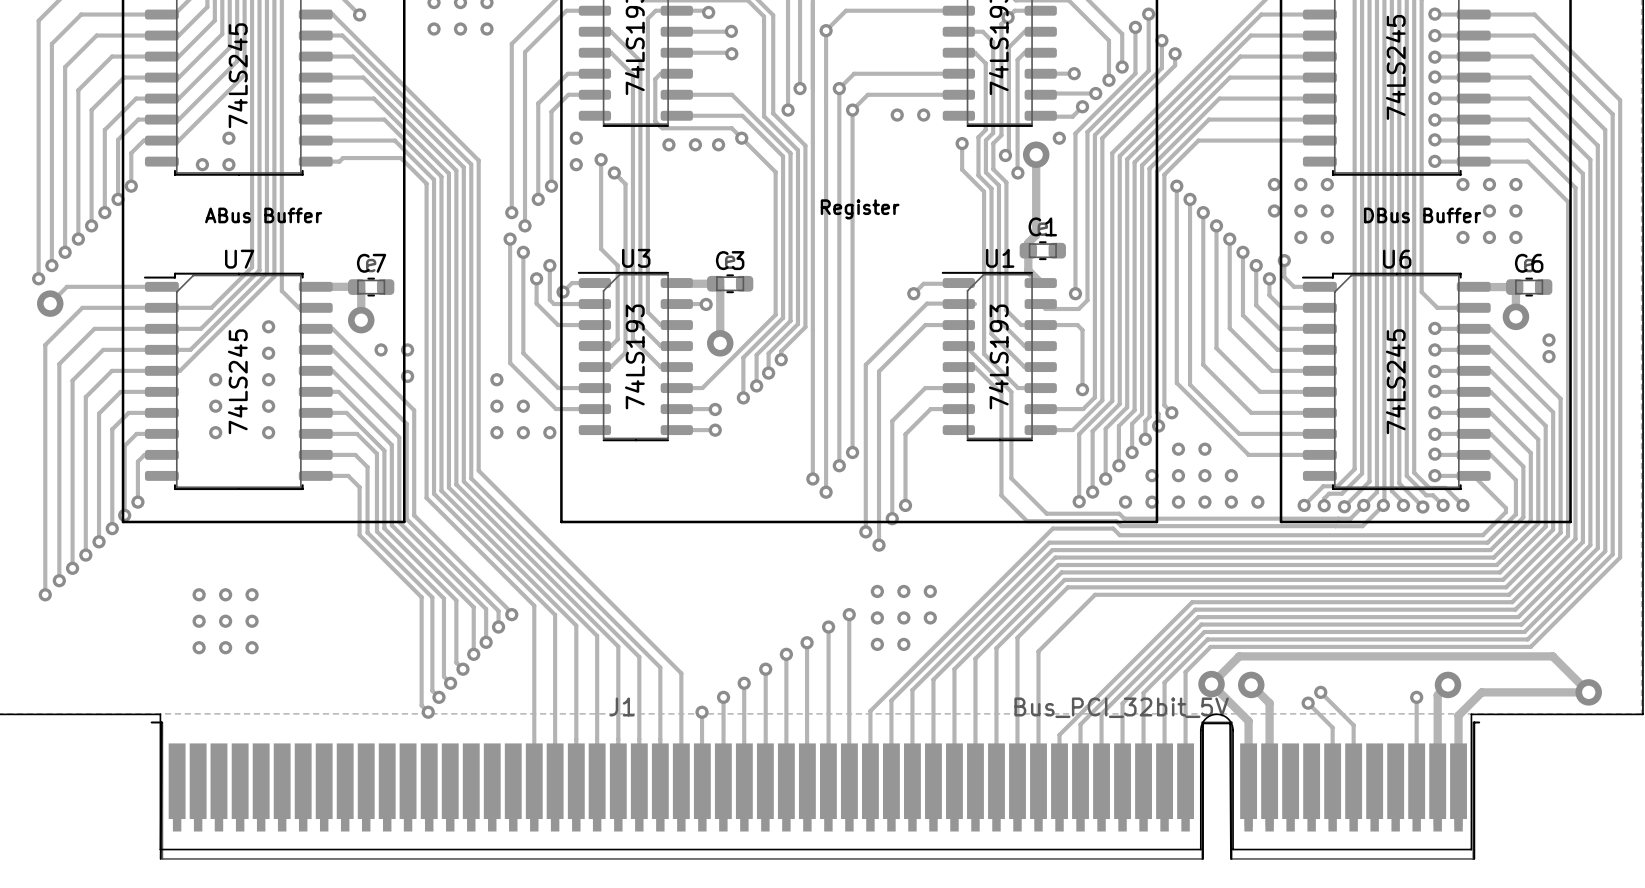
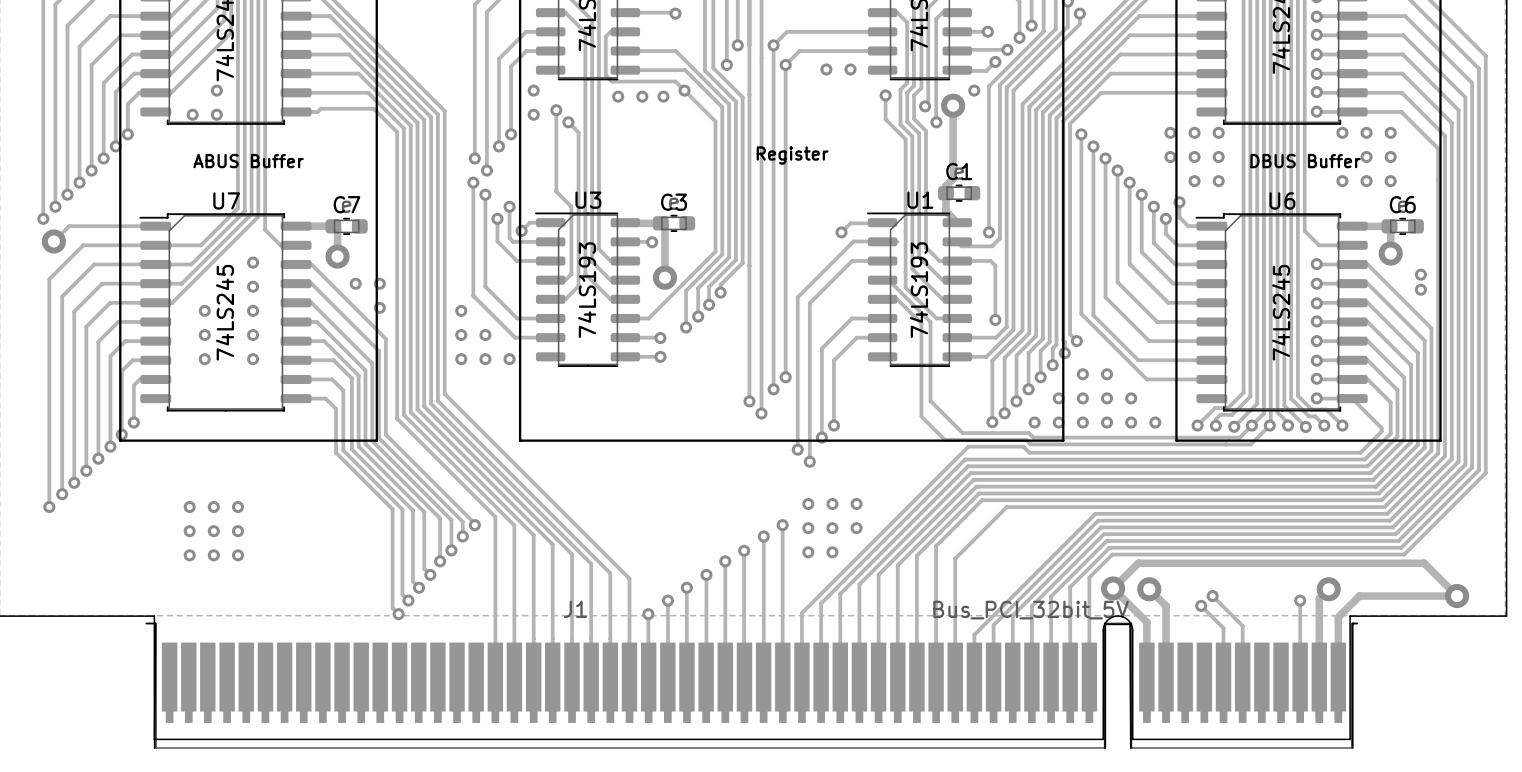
text: ABus Buffer (263, 215) -> ABUS Buffer (248, 161)
text: DBus Buffer (1422, 215) -> DBUS Buffer (1305, 161)

